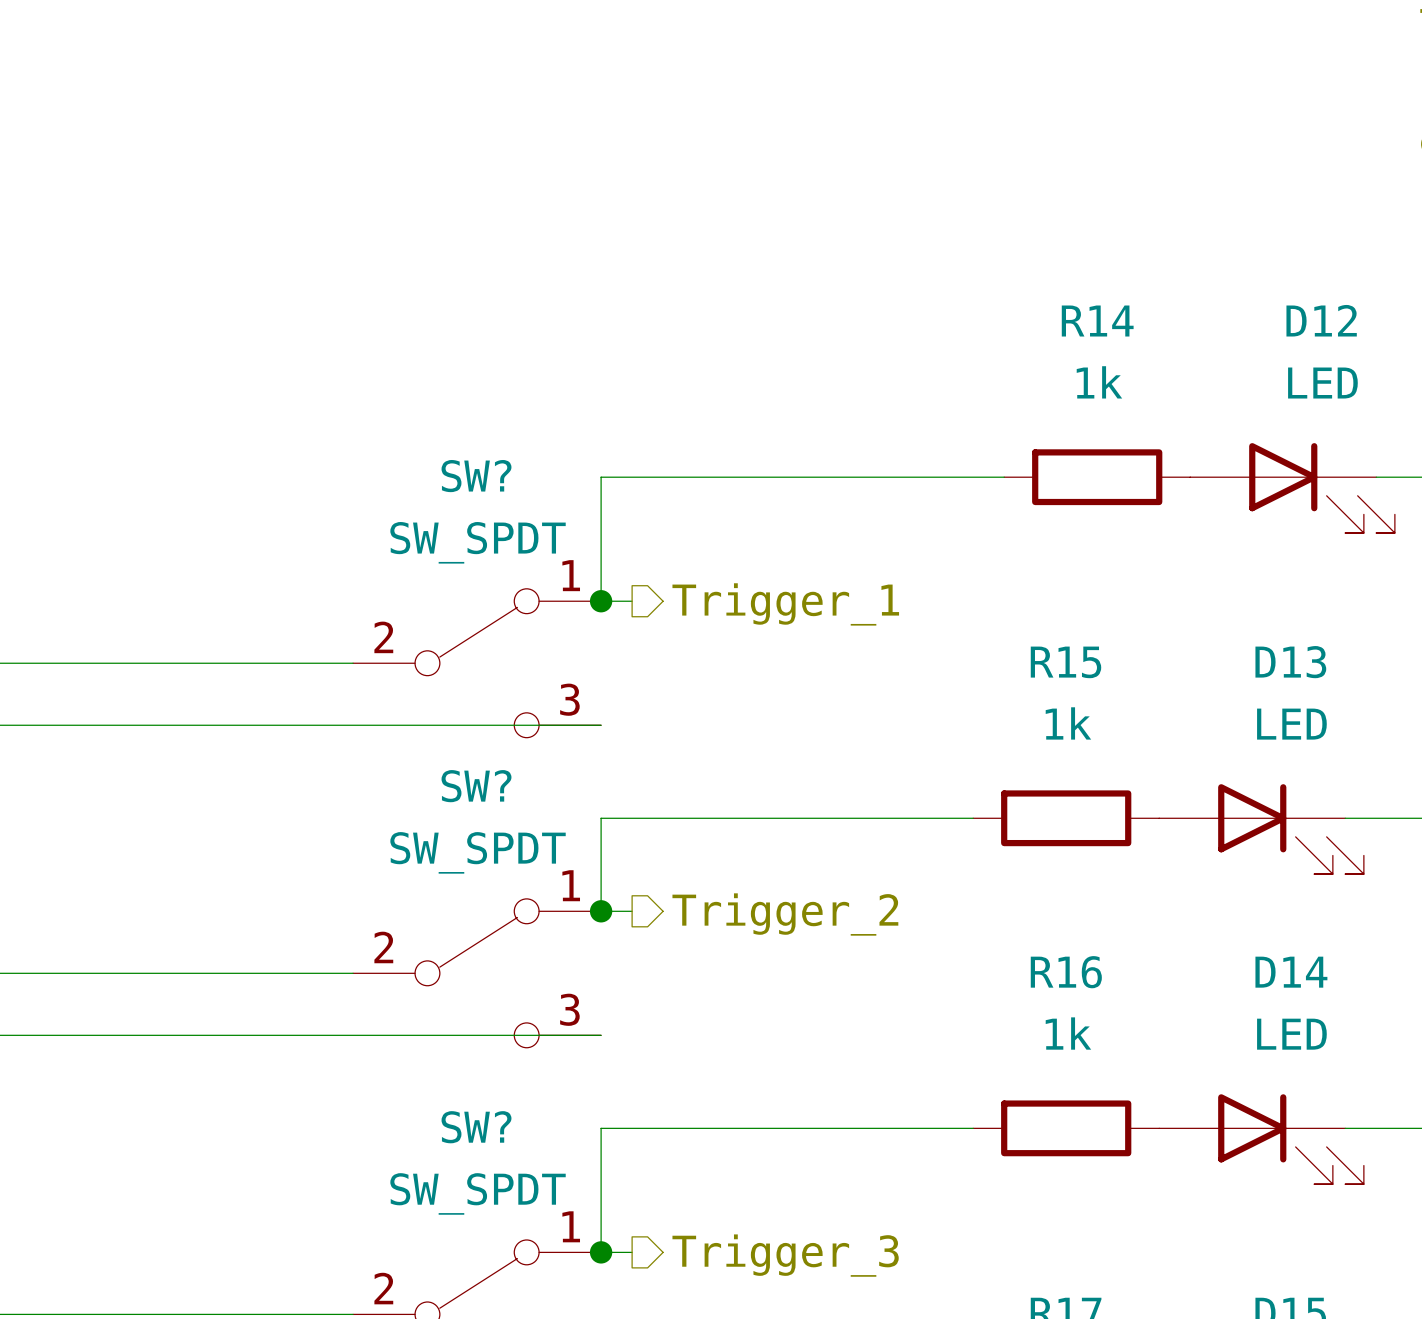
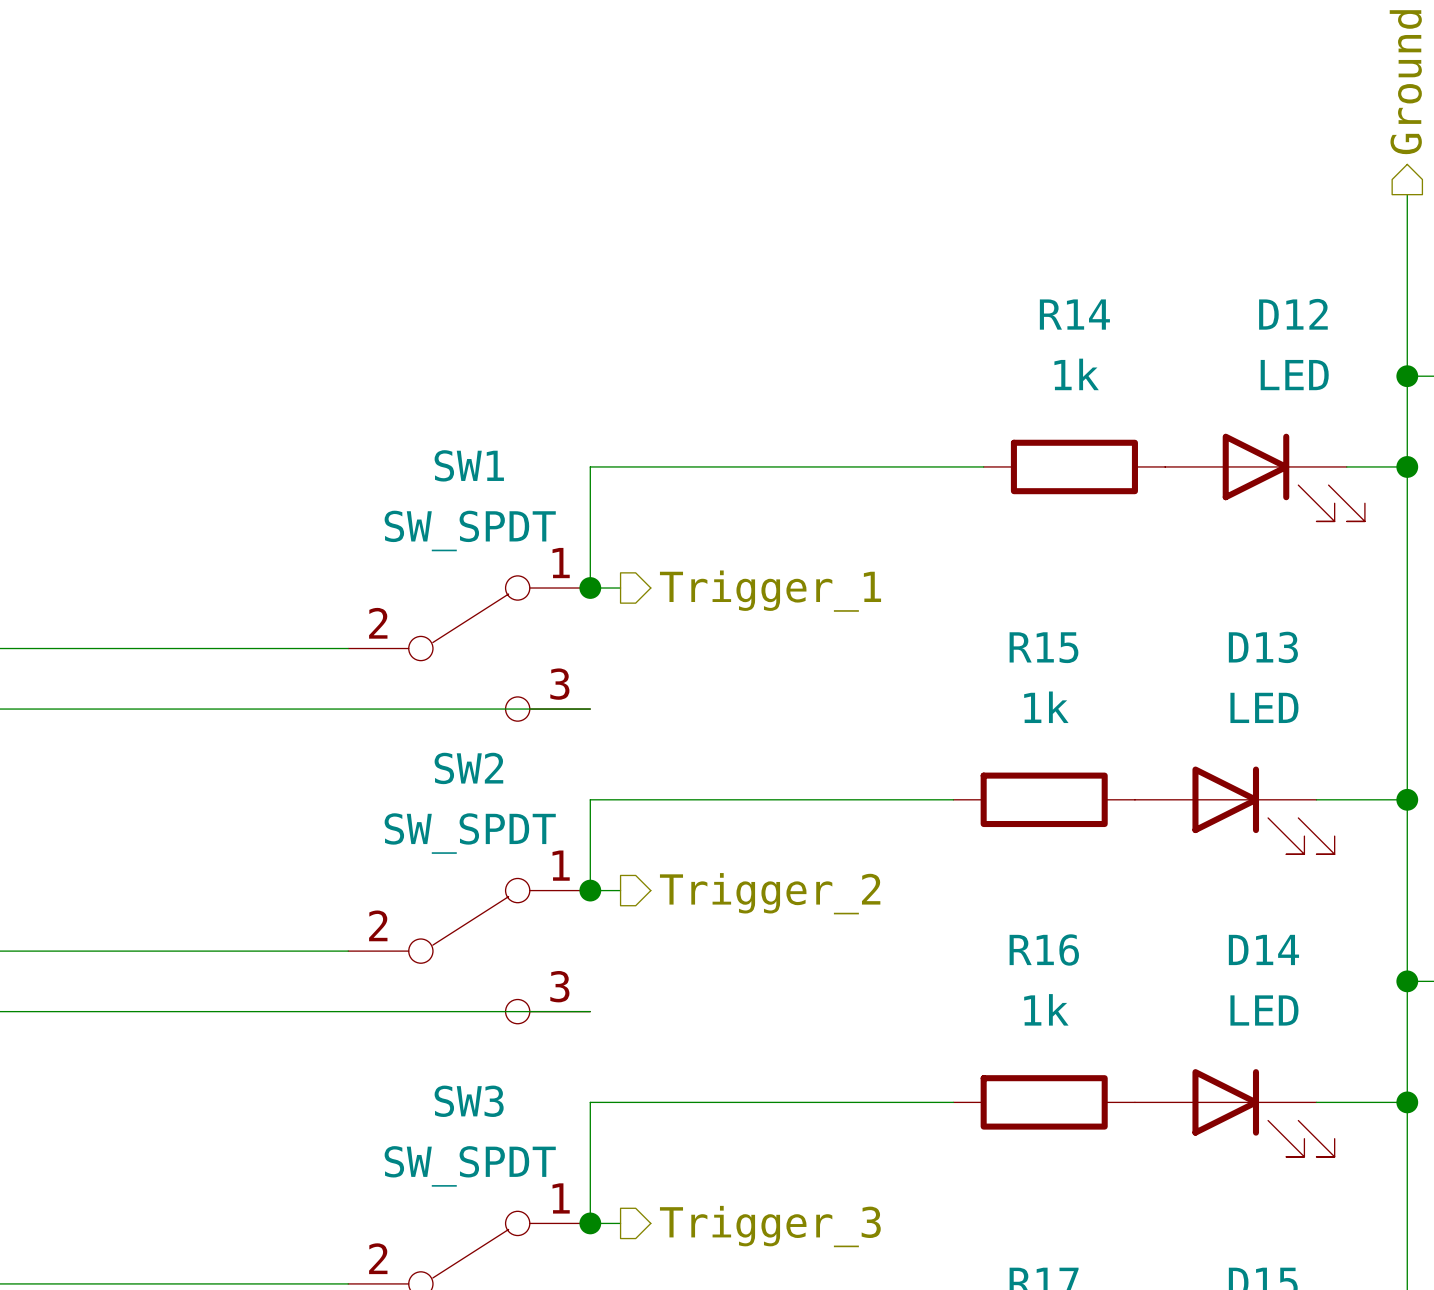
SW? name: SW? (476, 476) -> SW1 (469, 465)
SW? name: SW? (476, 786) -> SW2 (468, 768)
SW? name: SW? (476, 1127) -> SW3 (469, 1101)

